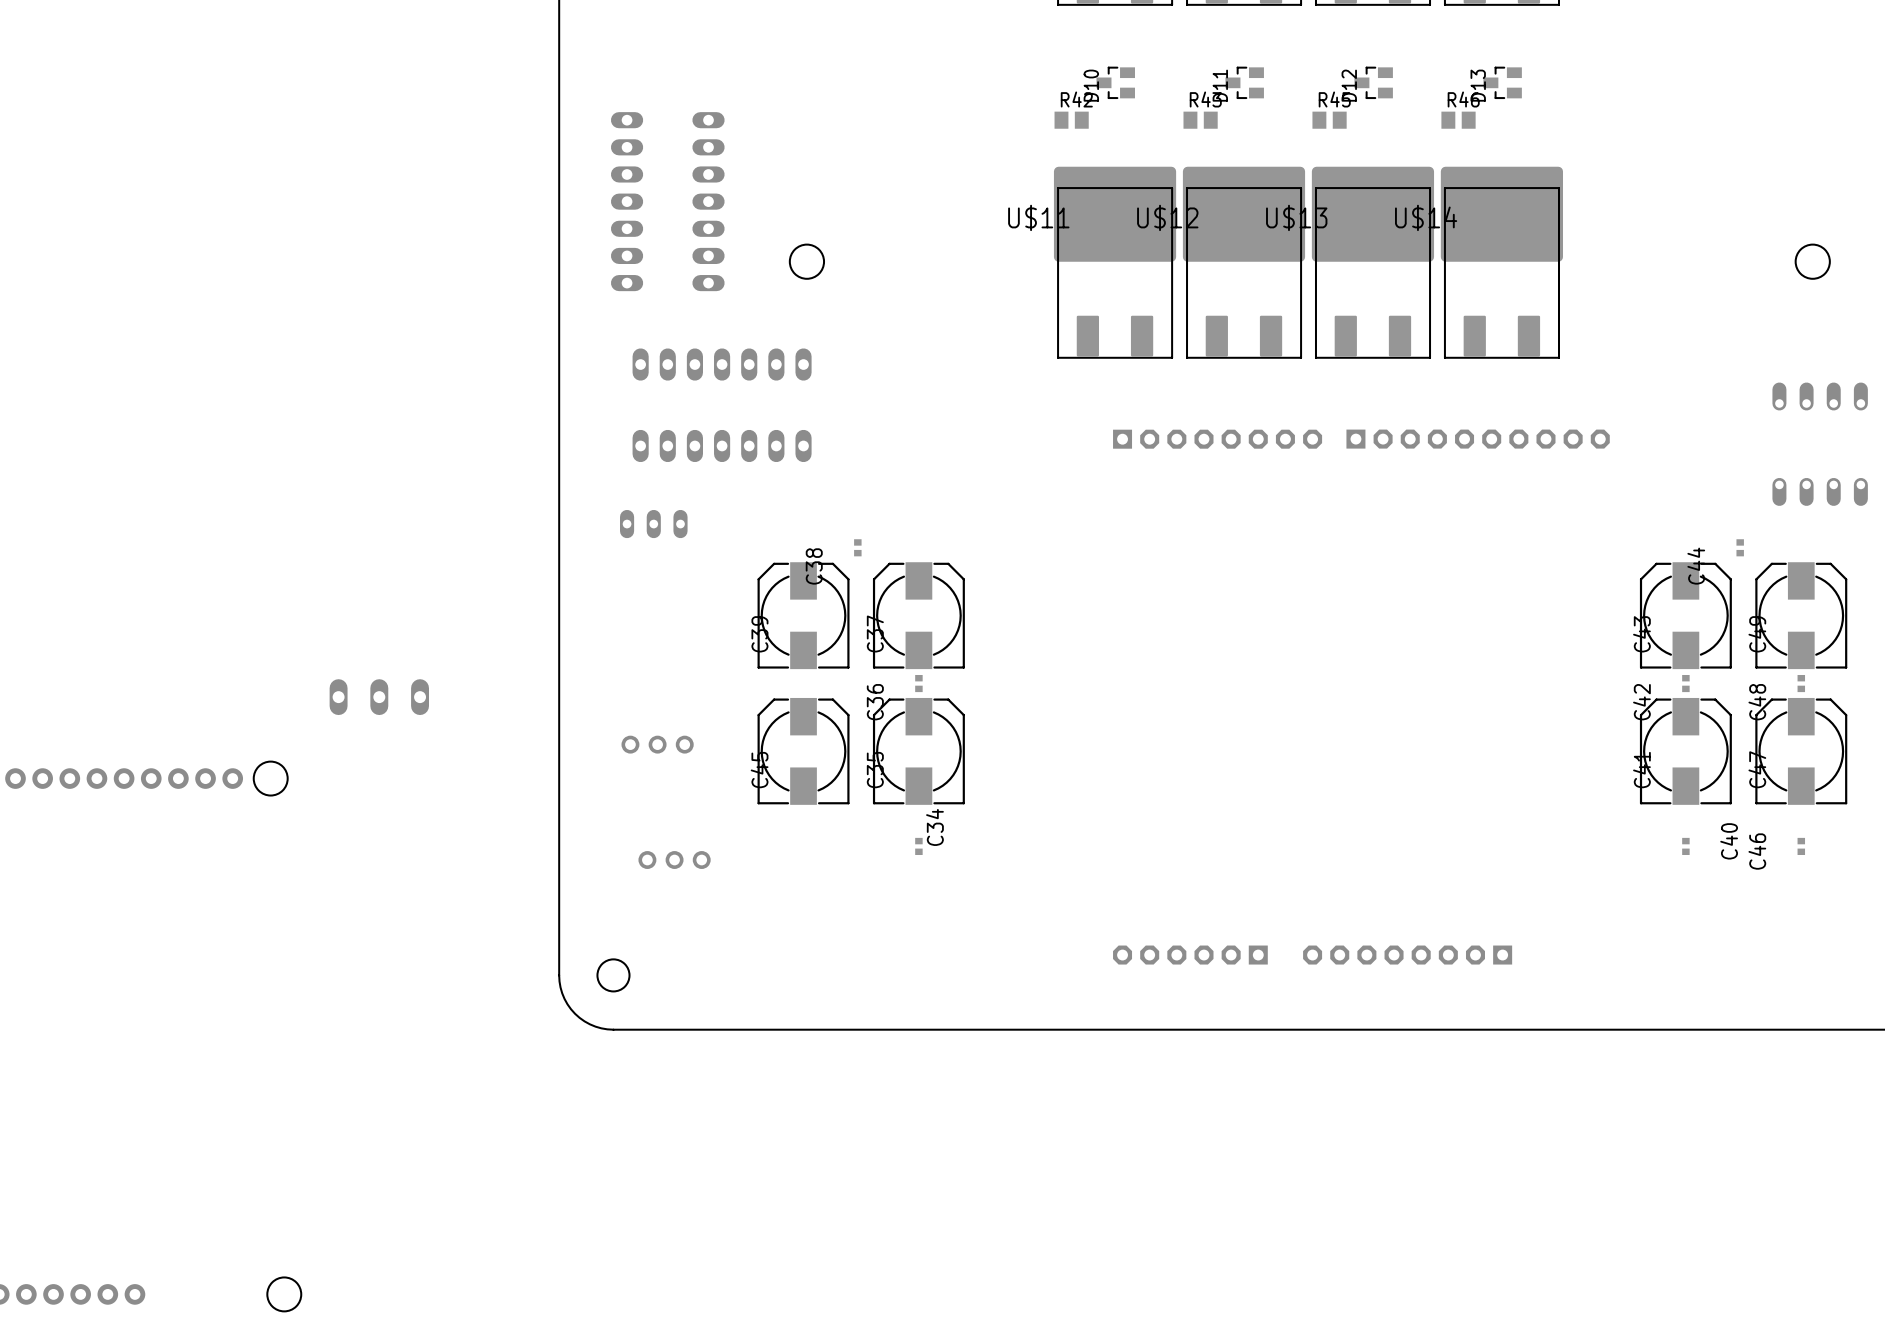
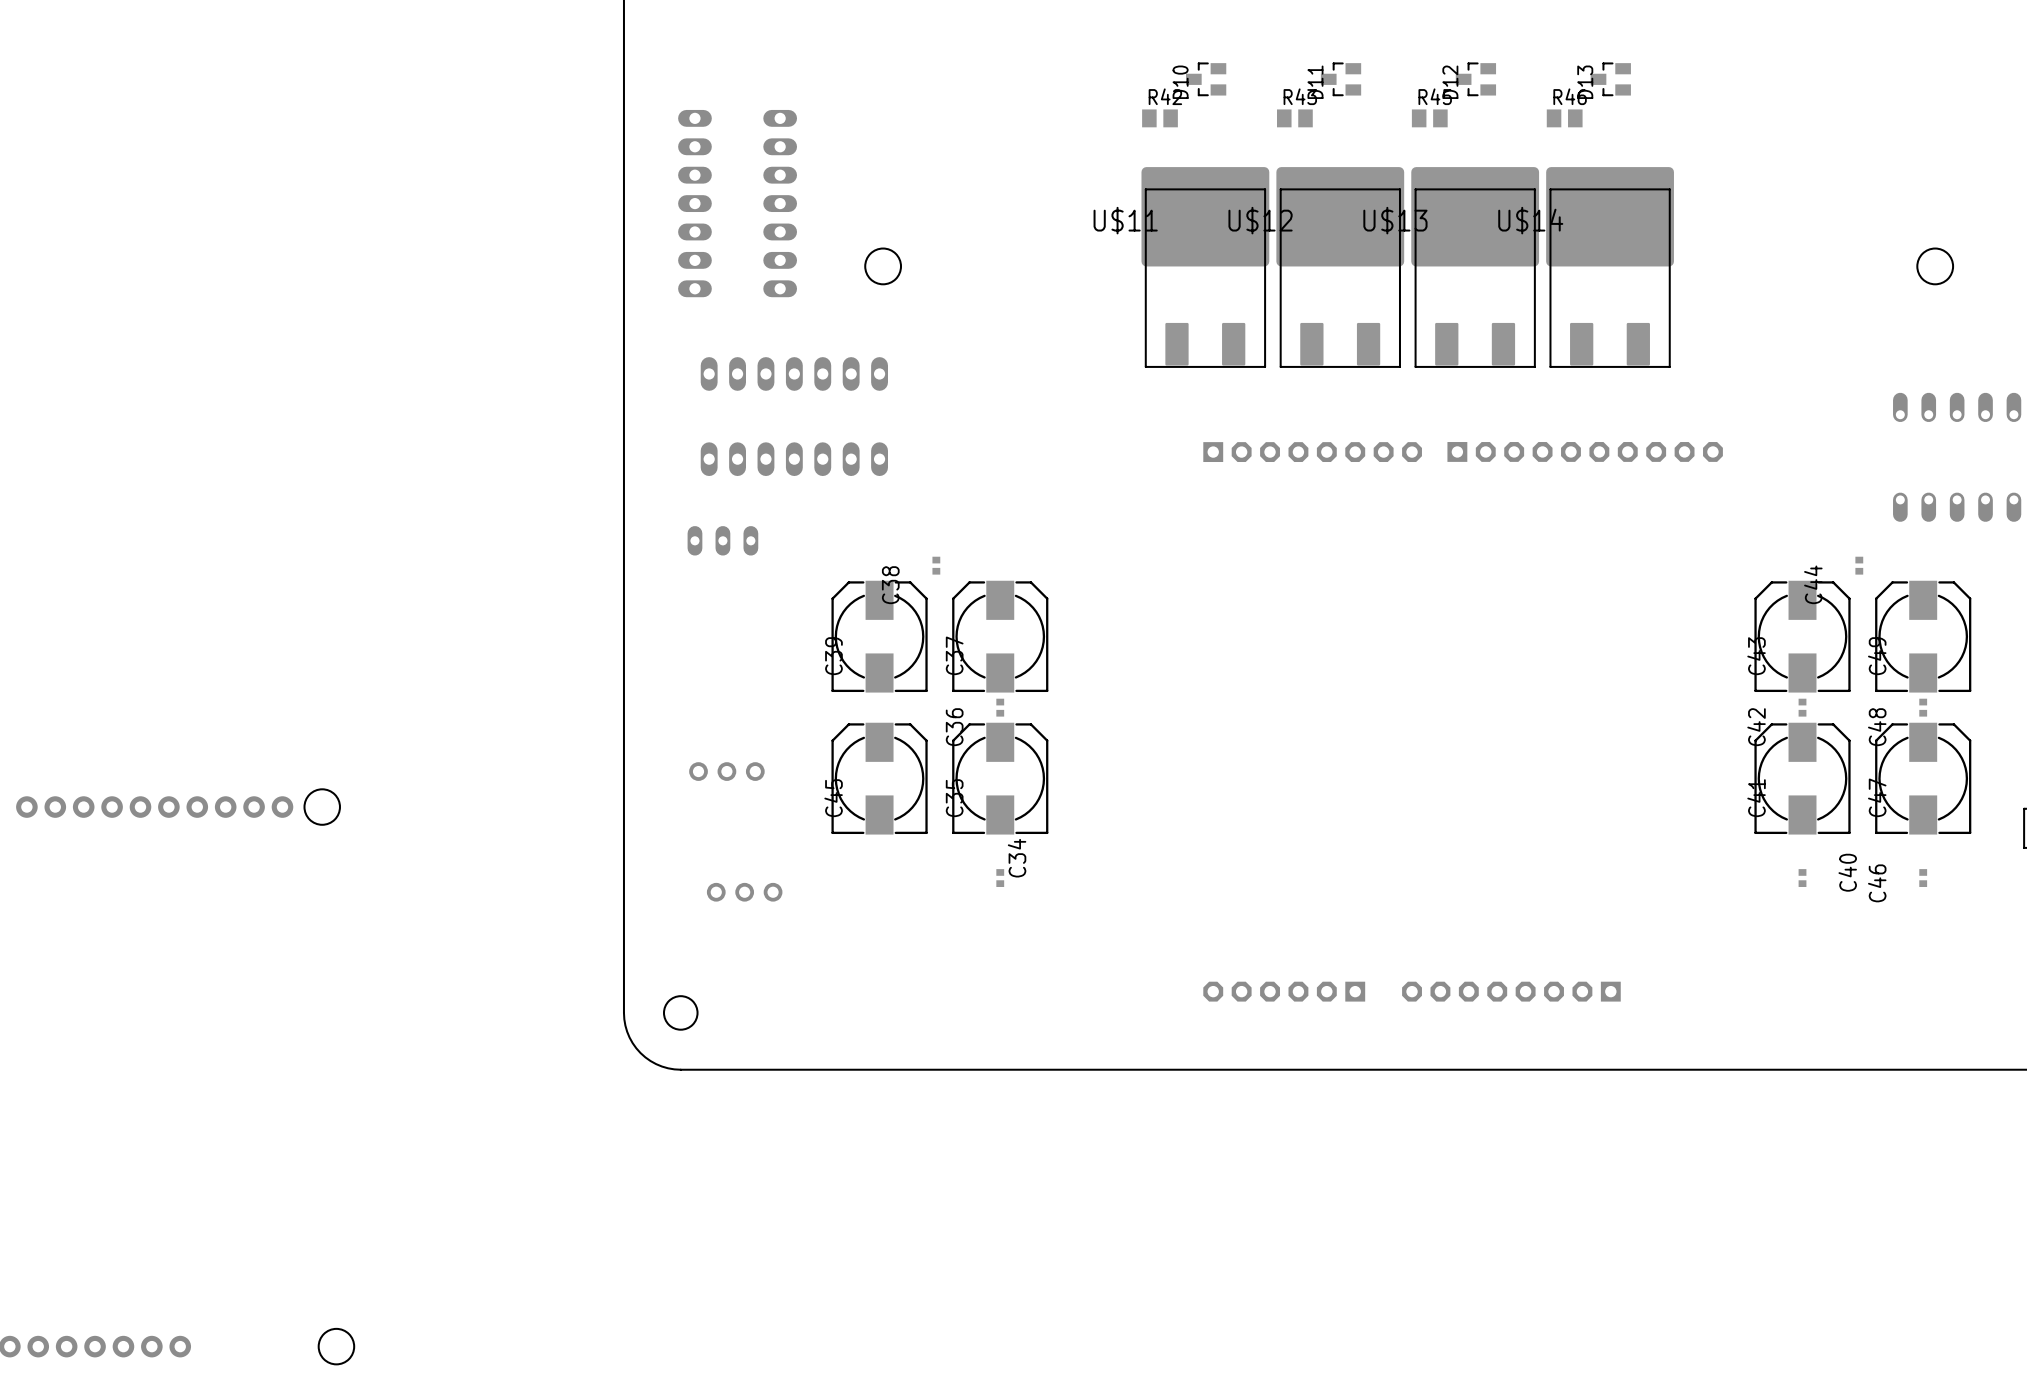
part: (379, 697) -> none

